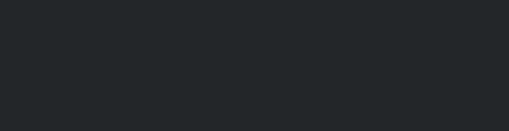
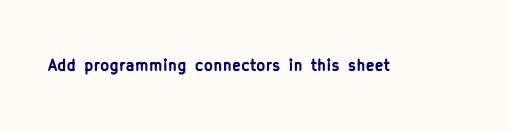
text: none -> Add programming connectors in this sheet (218, 66)

